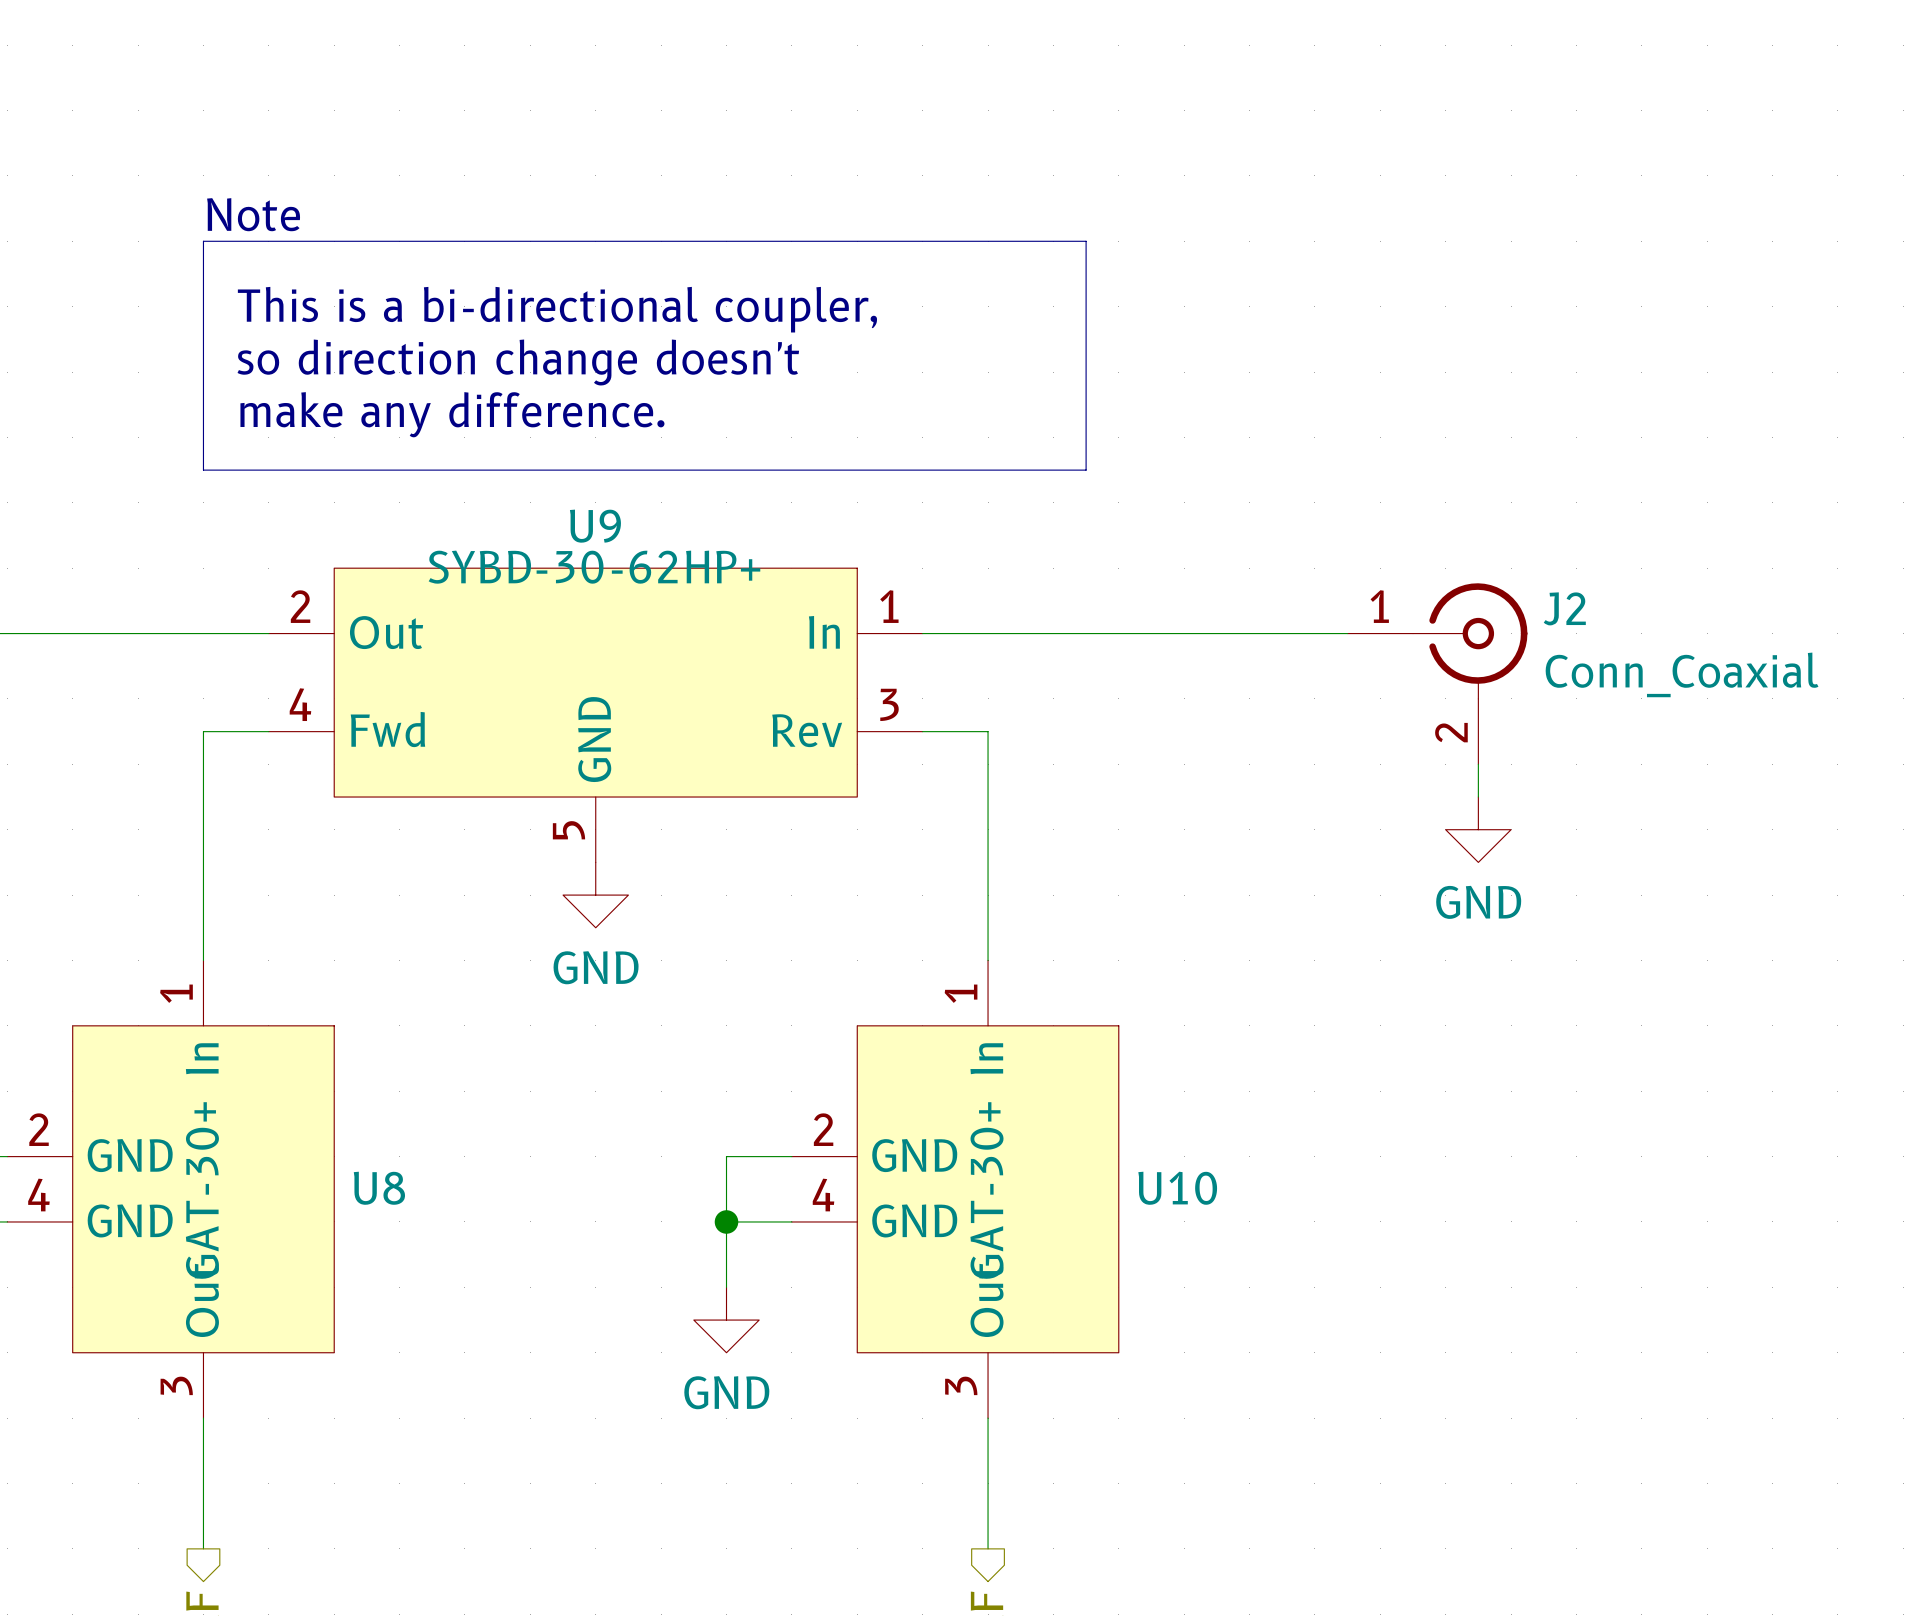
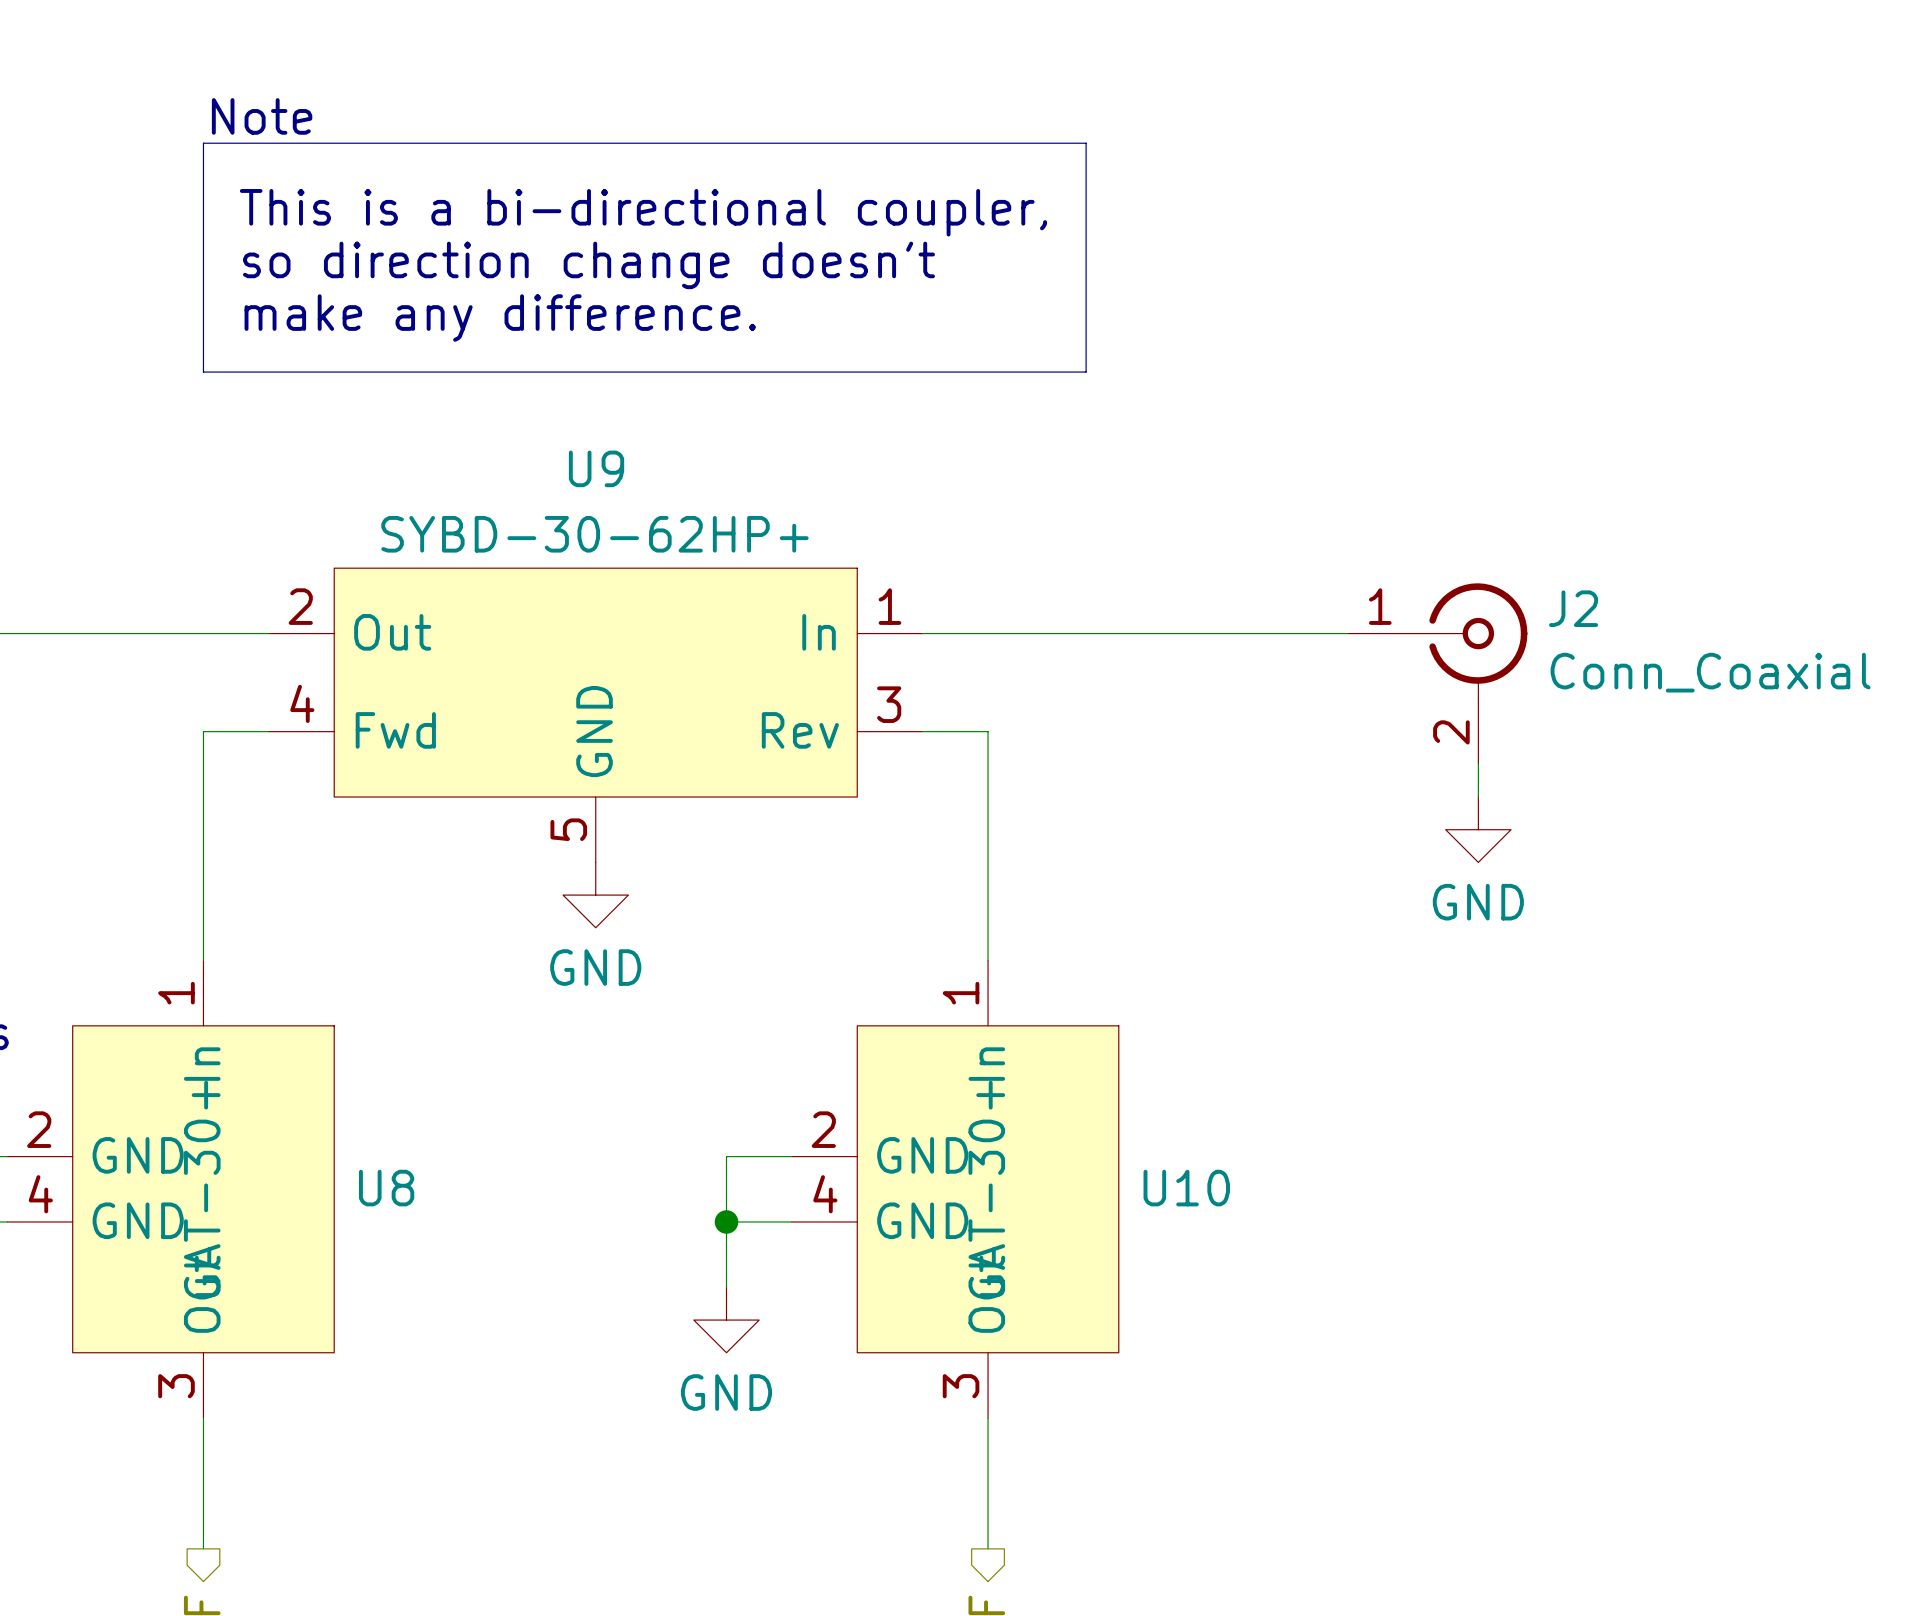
text position: Note (253, 214) -> Note (262, 116)
line: (203, 241) (1086, 241) -> (203, 241) (203, 143) (1086, 143) (1086, 241)
text position: This is a bi-directional coupler, (557, 309) -> This is a bi-directional coupler, (643, 212)
text position: so direction change doesn't (518, 362) -> so direction change doesn't (588, 265)
line: (203, 372) (203, 470) (1086, 470) (1086, 372) -> (203, 372) (1086, 372)
text position: make any difference. (452, 414) -> make any difference. (500, 318)
U9 name position: U9 (595, 526) -> U9 (596, 468)
U9 value position: SYBD-30-62HP+ (594, 567) -> SYBD-30-62HP+ (594, 534)

